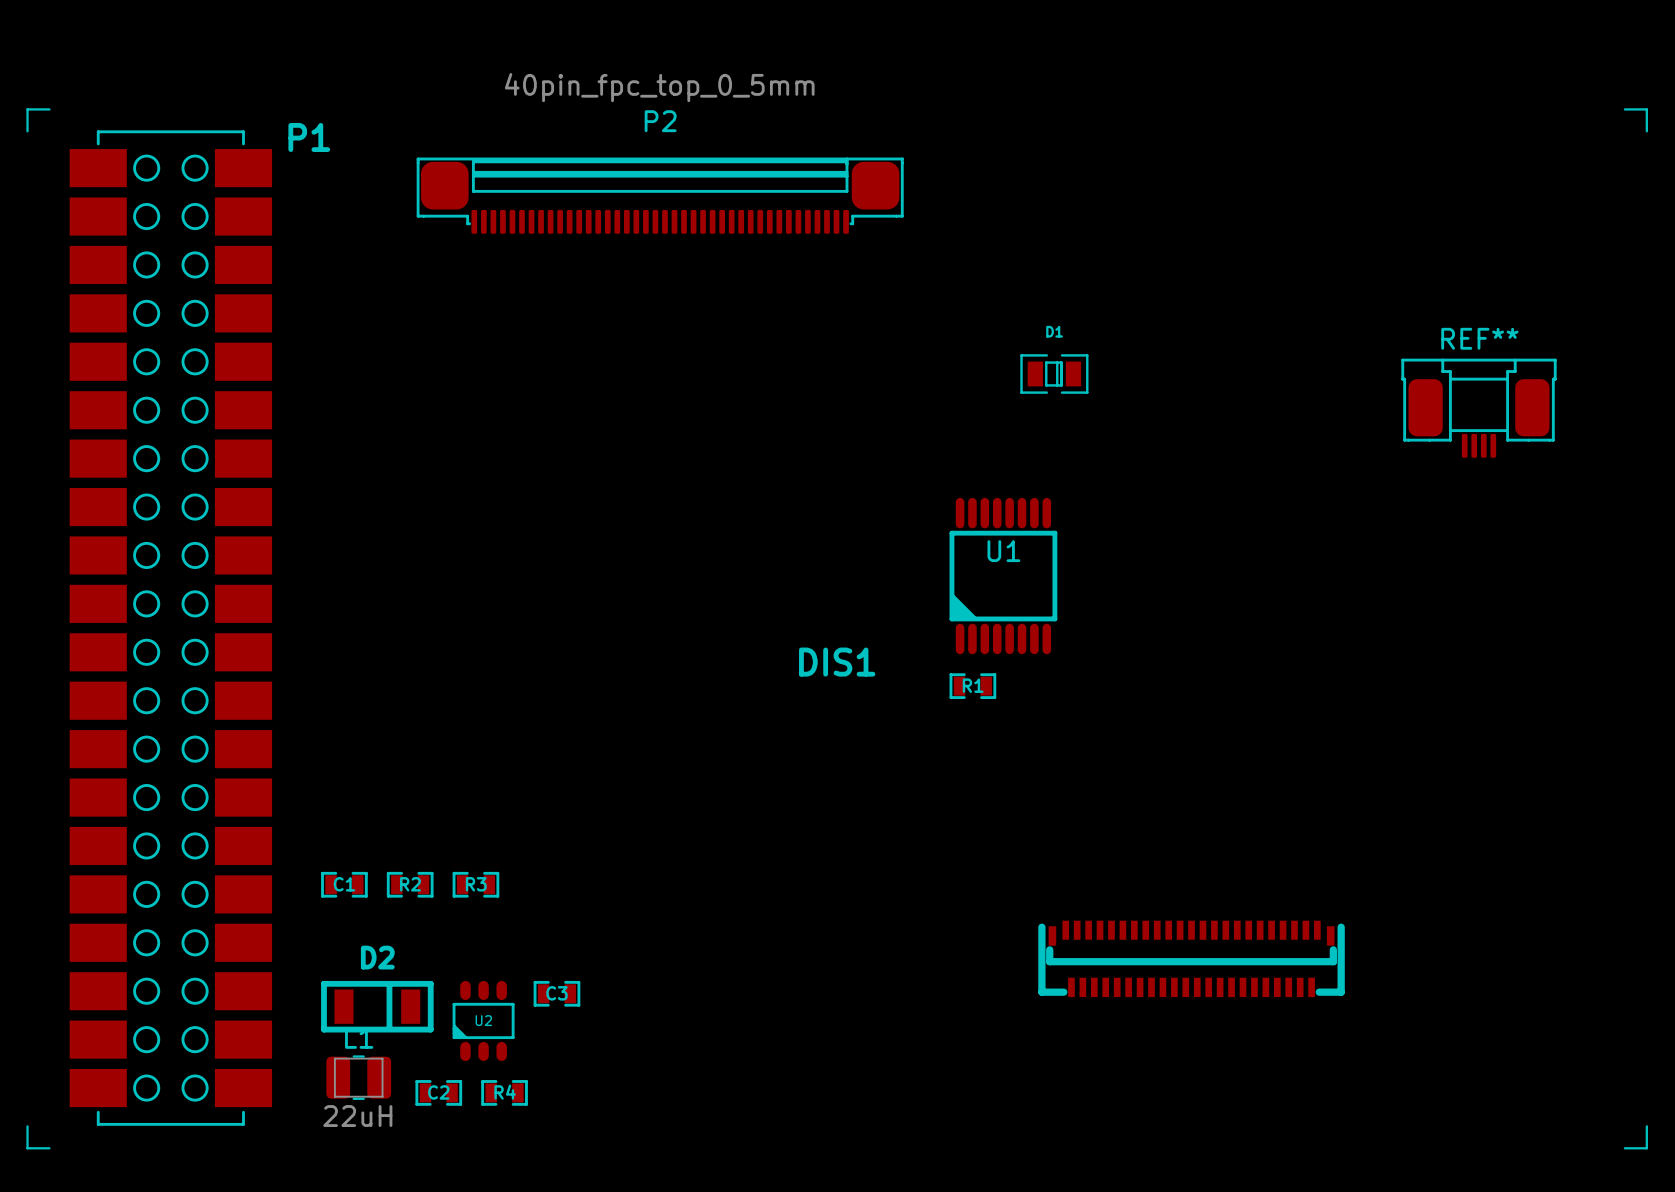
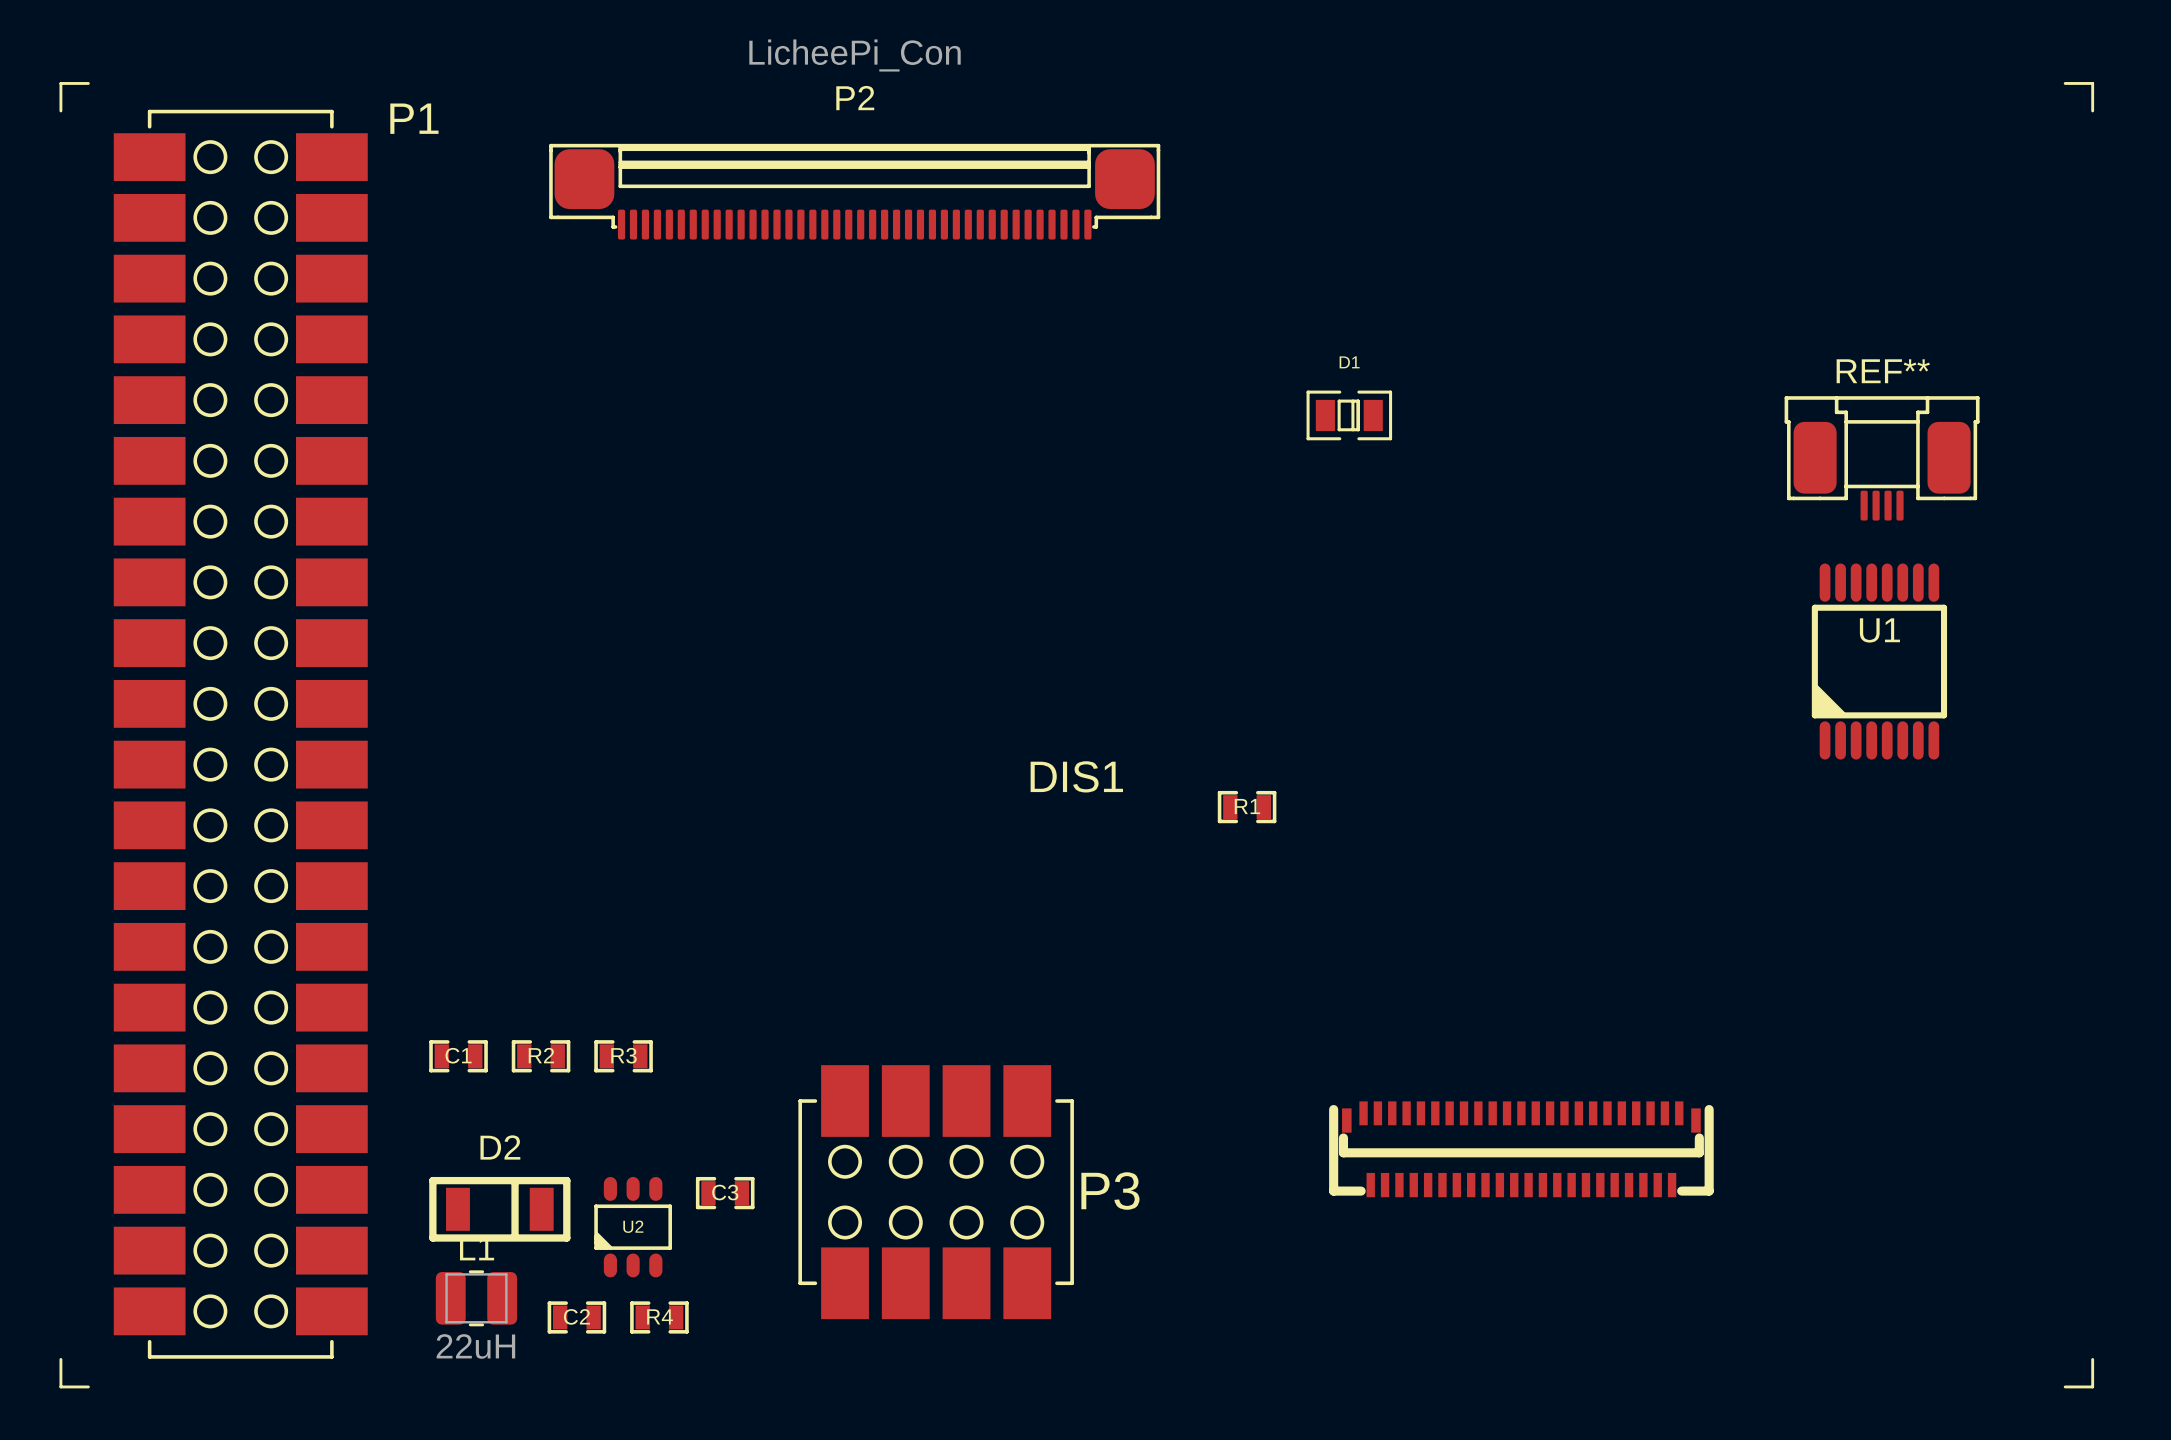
P2 value: 40pin_fpc_top_0_5mm (659, 87) -> LicheePi_Con (855, 55)
U1 position: (1003, 576) -> (1879, 661)
P3: none -> (936, 1192)

